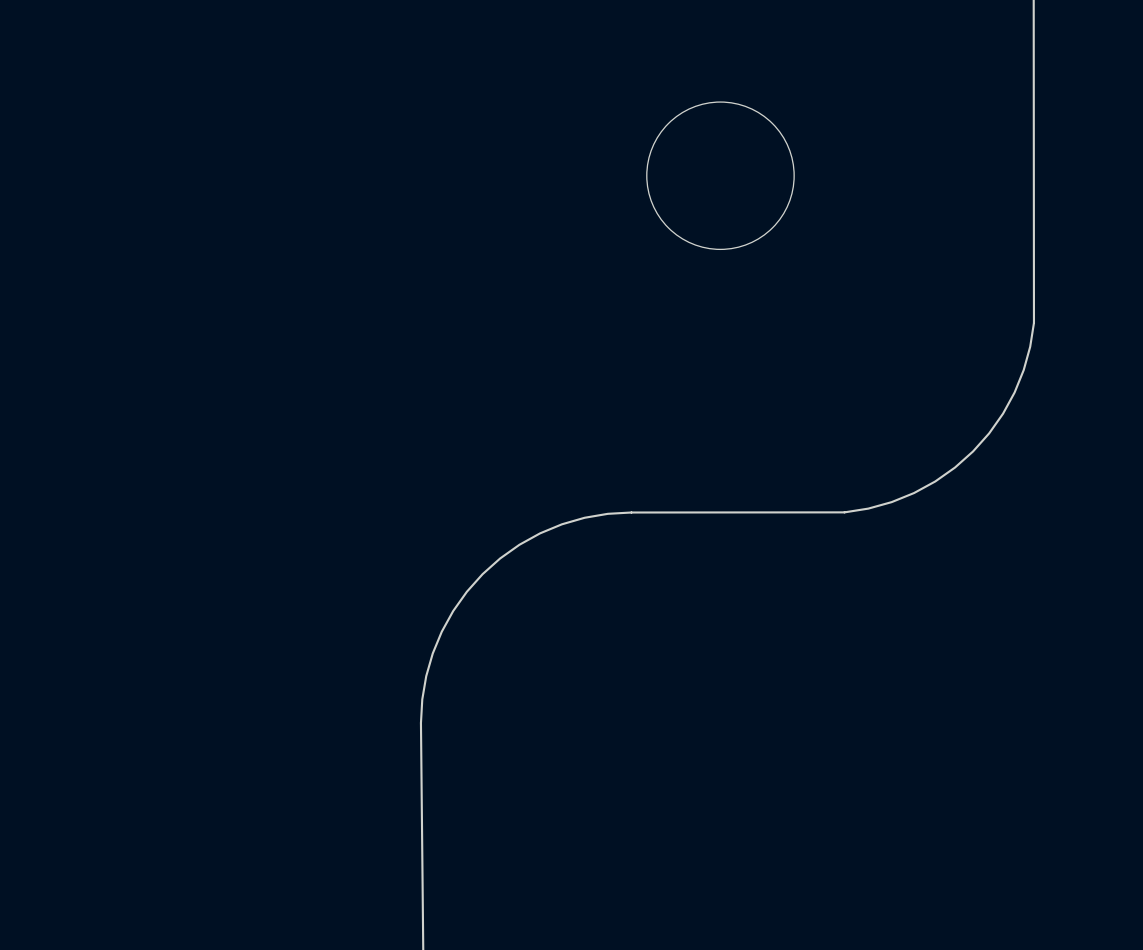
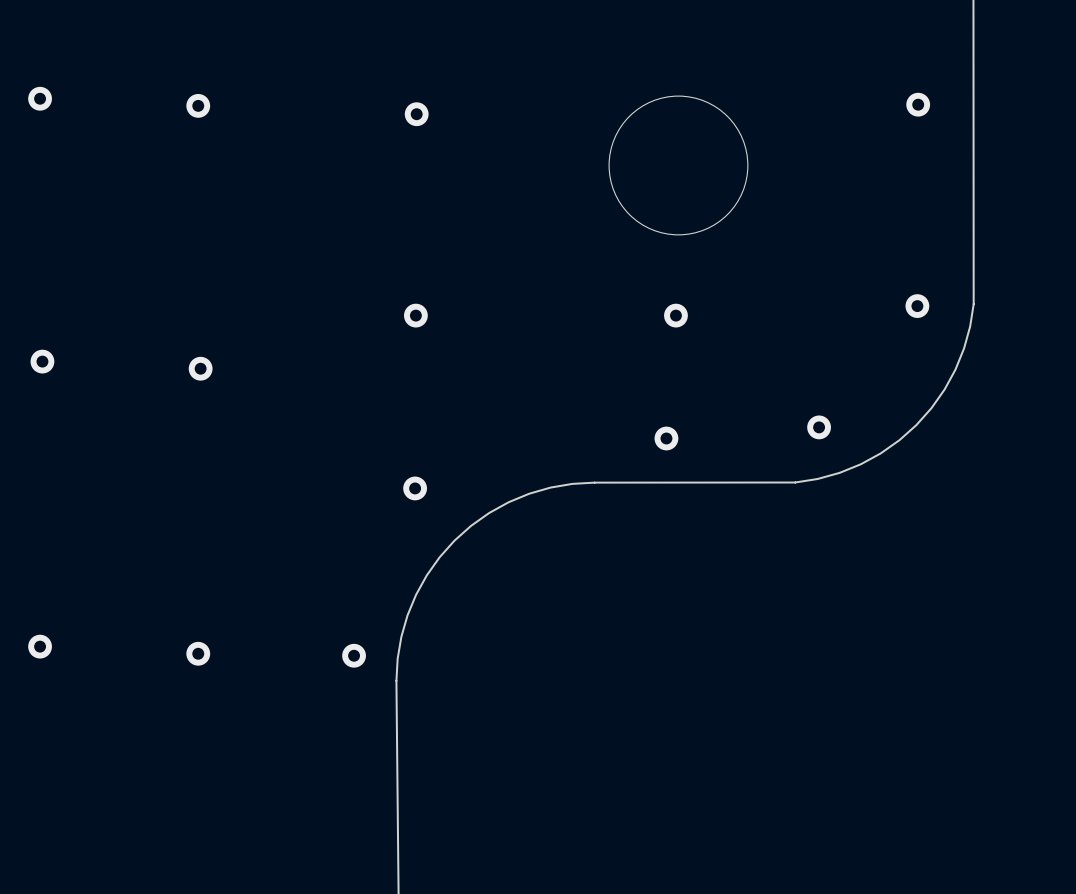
via: none -> (40, 98)
via: none -> (918, 104)
via: none -> (198, 105)
via: none -> (416, 114)
via: none -> (917, 306)
via: none -> (415, 315)
via: none -> (675, 315)
via: none -> (42, 361)
via: none -> (200, 368)
via: none -> (819, 427)
via: none -> (666, 438)
via: none -> (415, 488)
via: none -> (40, 646)
via: none -> (198, 653)
via: none -> (354, 655)

